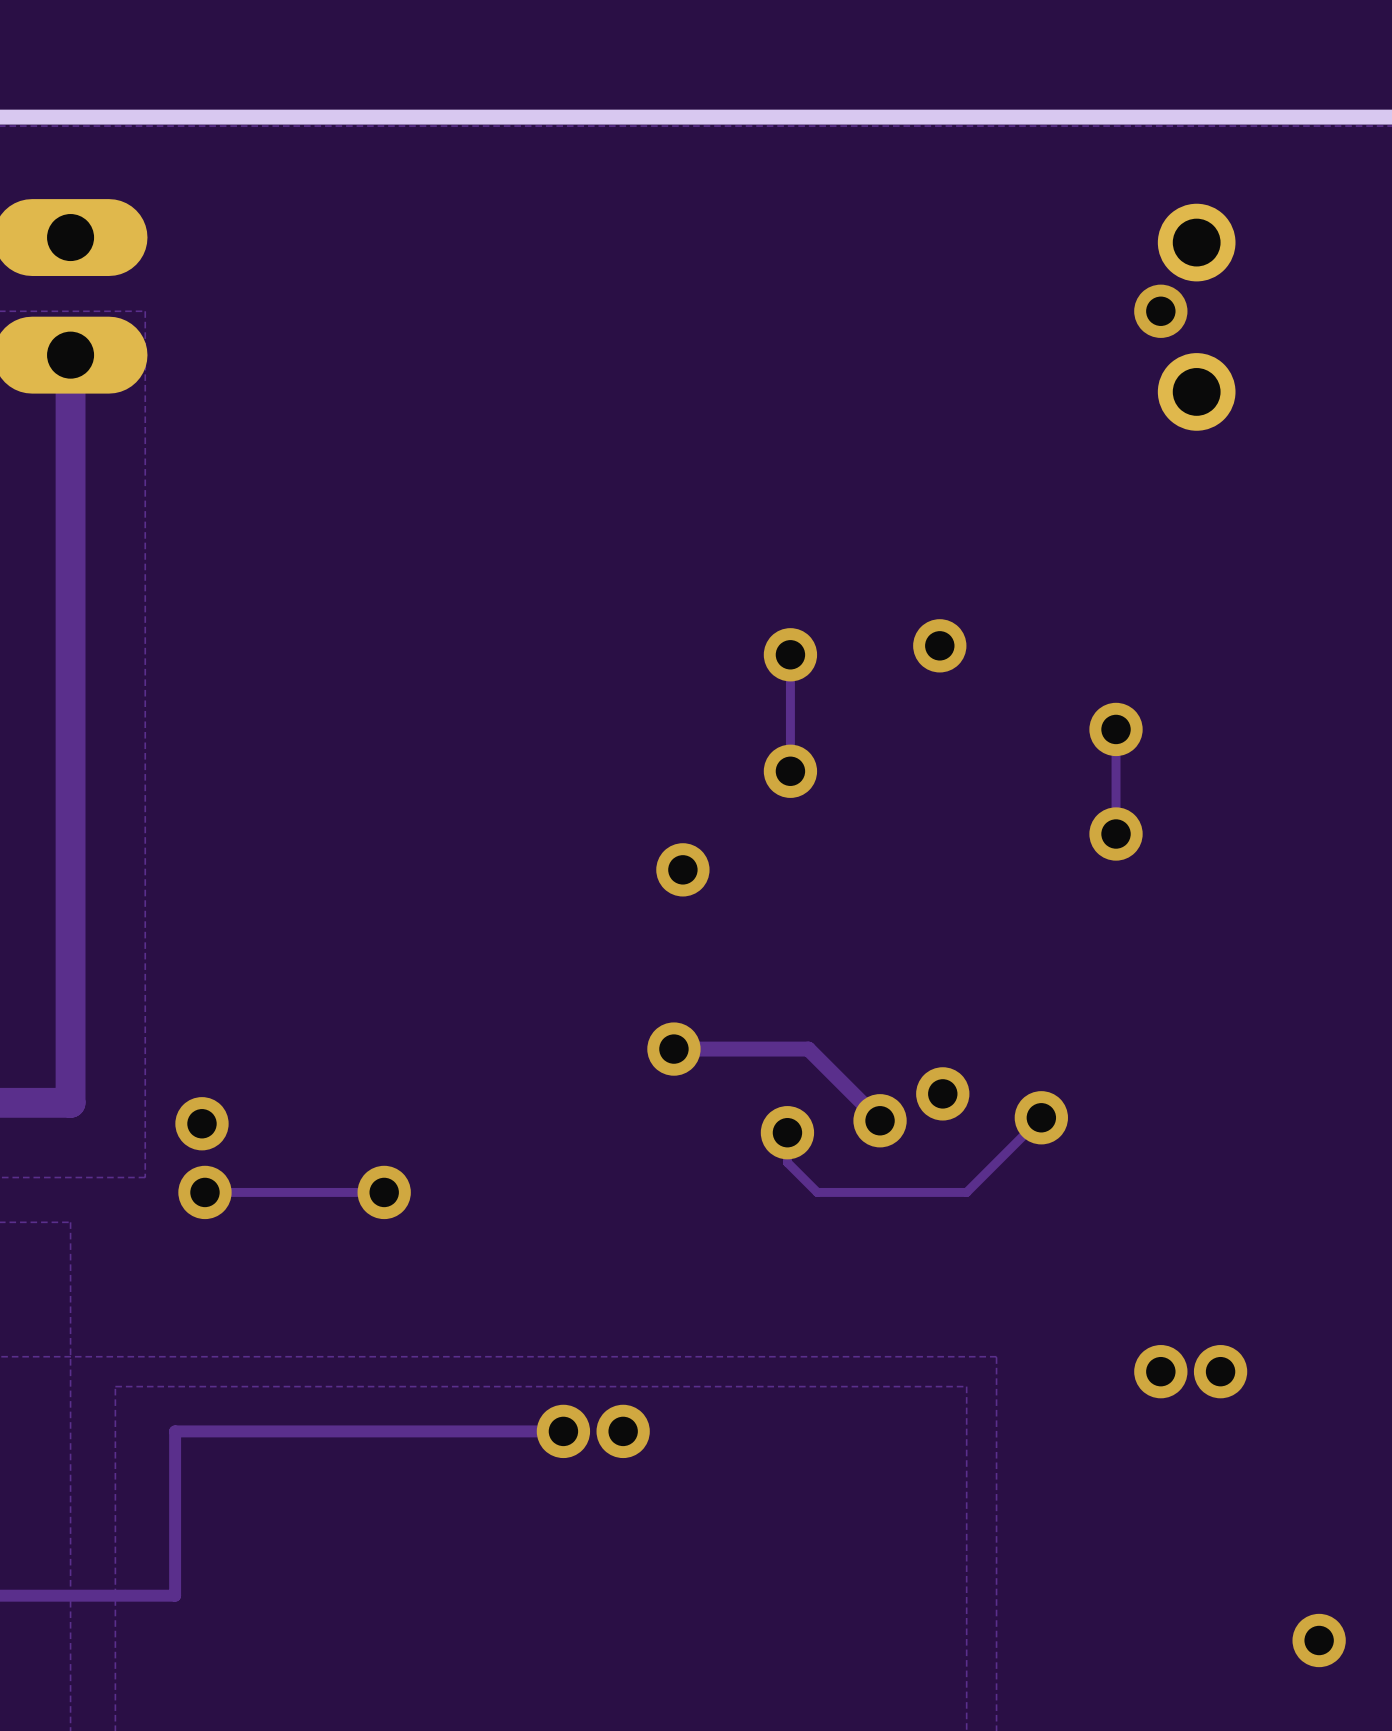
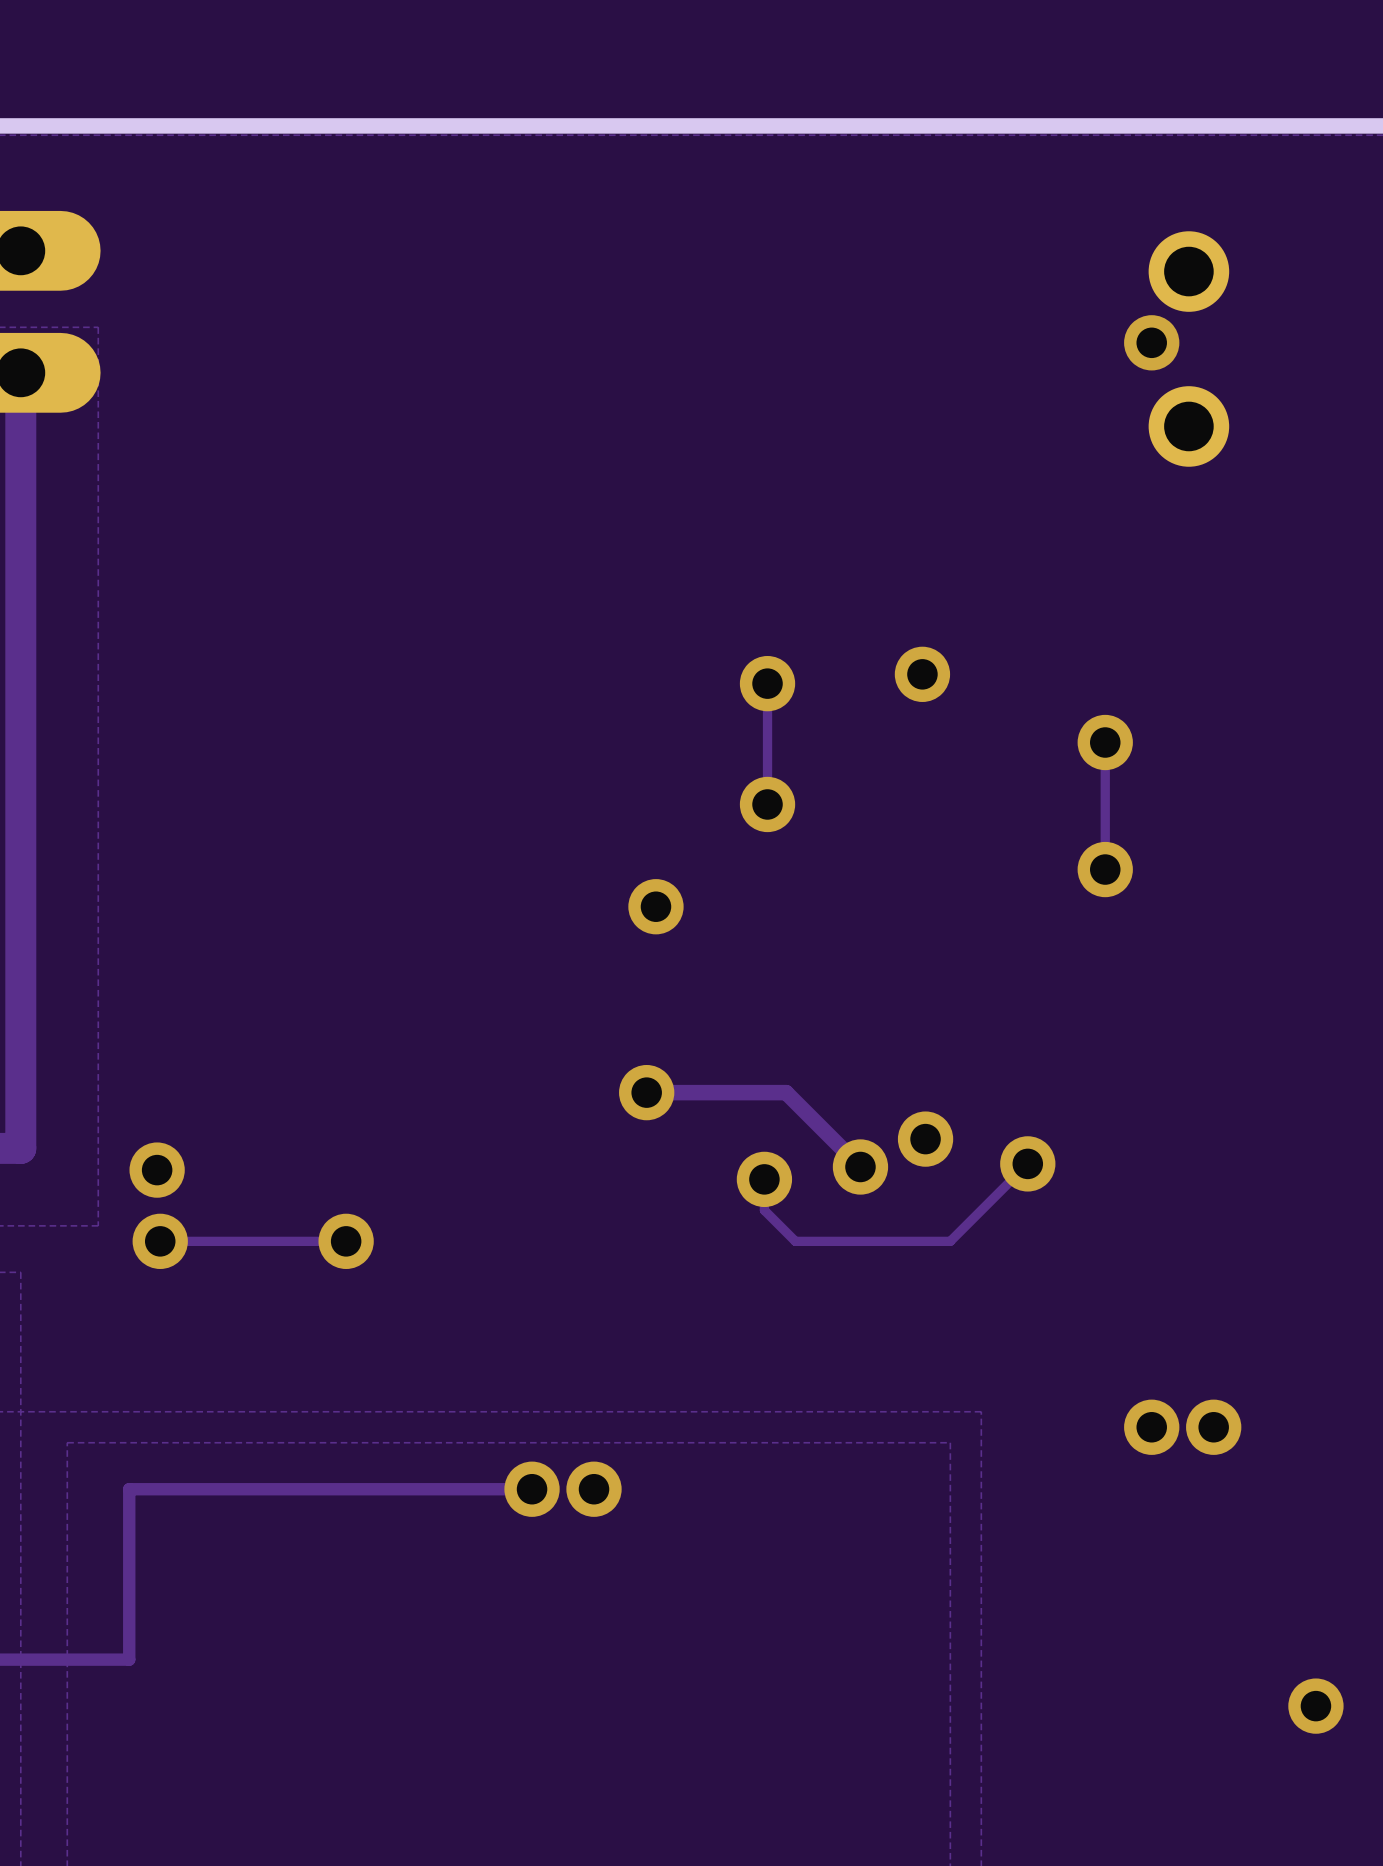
via position: (1160, 311) -> (1151, 342)
part position: (1196, 317) -> (1188, 349)
via position: (1116, 729) -> (1105, 742)

